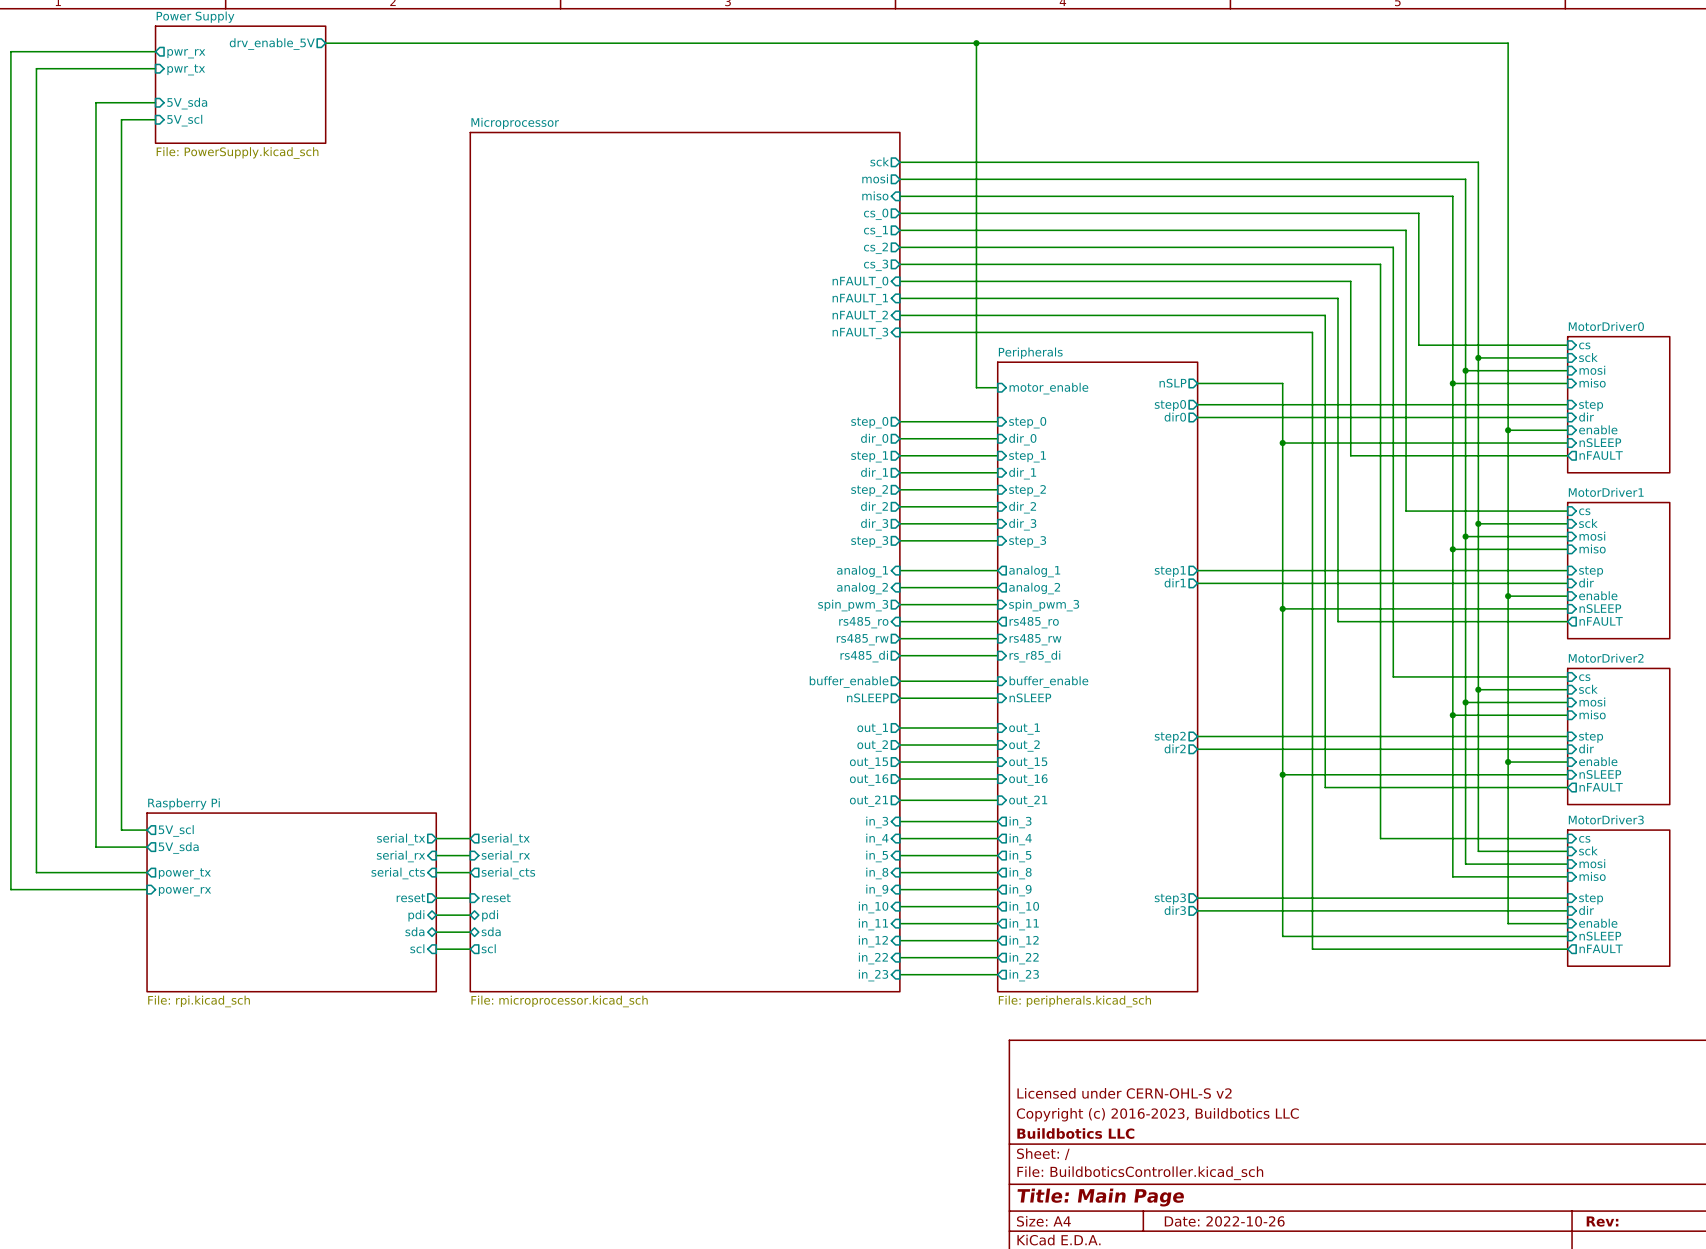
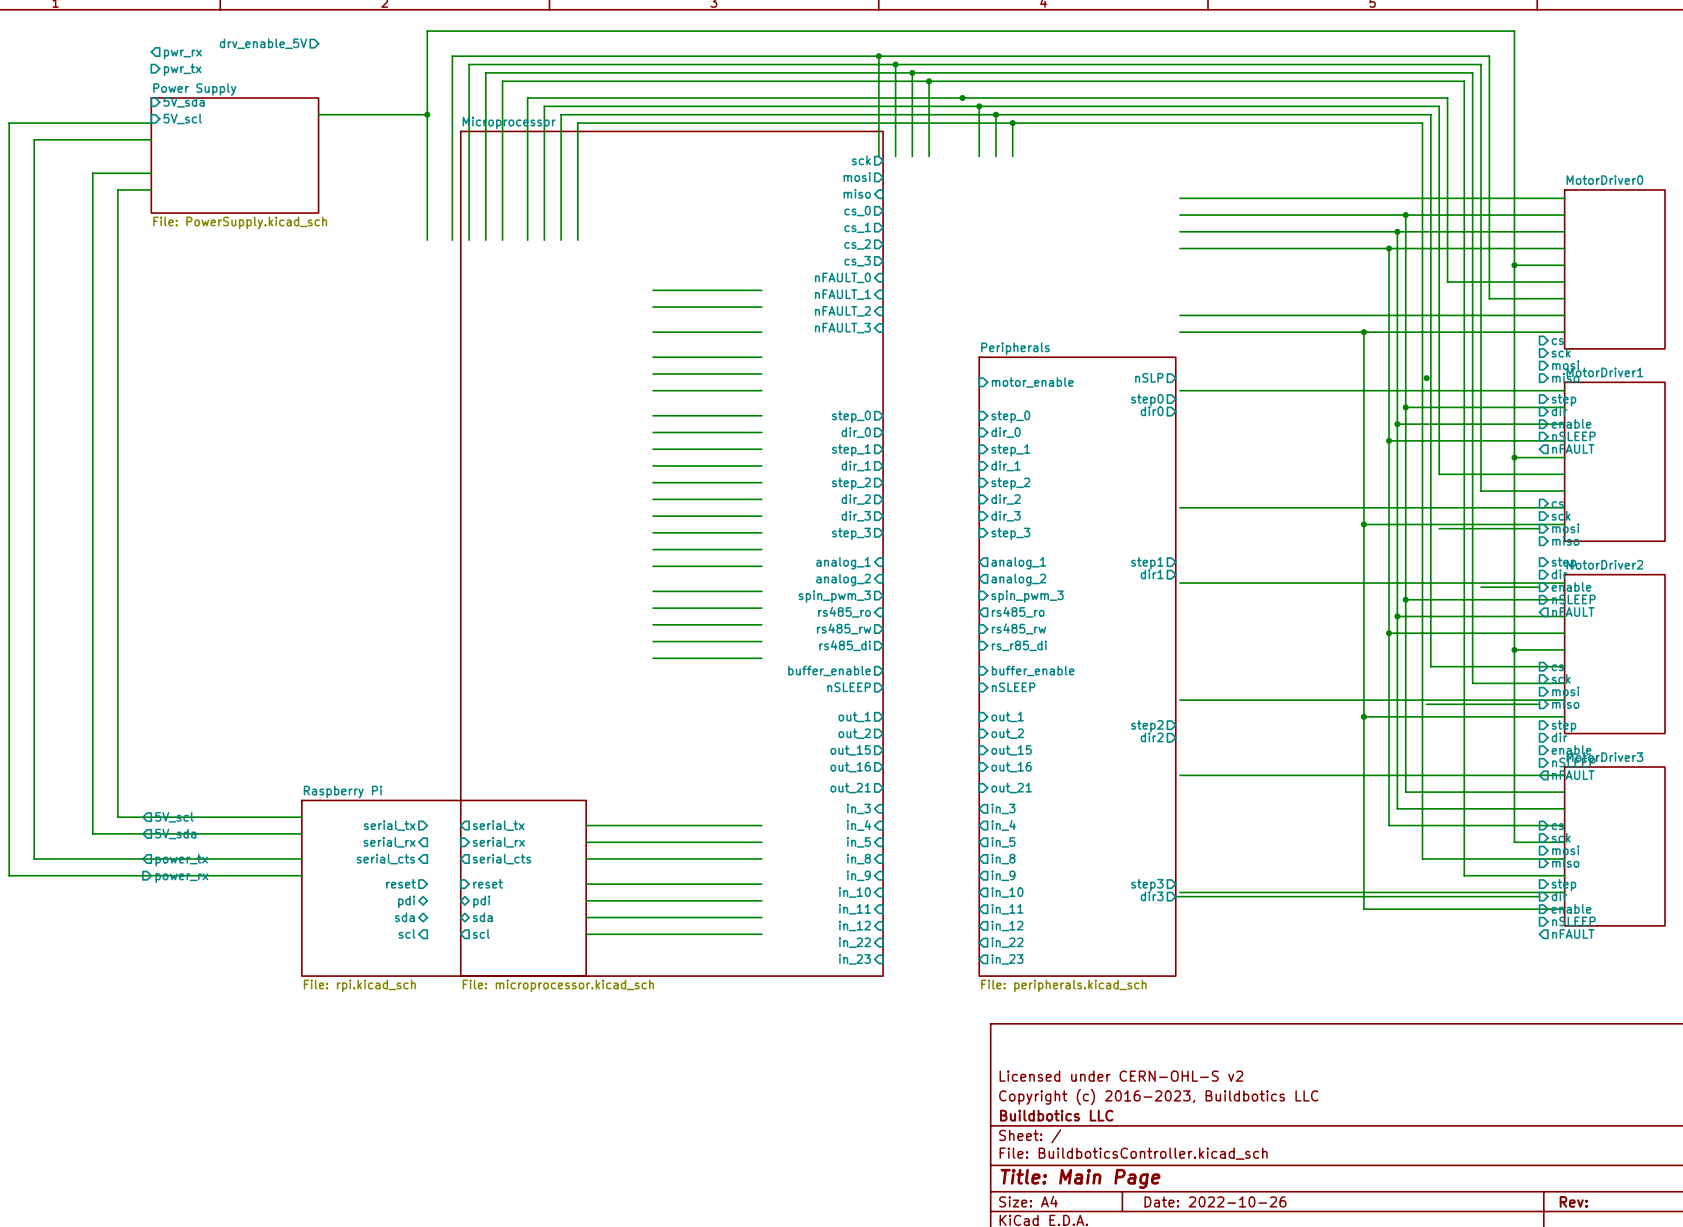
wire: (325, 43) (1508, 43) (1508, 64) -> (469, 240) (469, 64) (1481, 64)
wire: (976, 43) (976, 387) (997, 387) -> none
junction: (976, 43) -> none
wire: (155, 51) (10, 51) (10, 124) -> (151, 123) (9, 123)
wire: none -> (878, 56) (878, 156)
junction: none -> (878, 56)
wire: none -> (895, 64) (895, 156)
junction: none -> (895, 64)
wire: (155, 68) (36, 68) (36, 141) -> (151, 139) (34, 139)
wire: none -> (912, 72) (912, 156)
junction: none -> (912, 72)
wire: none -> (929, 81) (929, 156)
junction: none -> (929, 81)
sheet Power Supply position: (240, 84) -> (234, 155)
junction: none -> (962, 97)
wire: (155, 102) (95, 102) (95, 175) -> (151, 173) (92, 173)
wire: none -> (979, 106) (979, 156)
junction: none -> (979, 106)
wire: none -> (318, 114) (427, 114)
junction: none -> (427, 114)
wire: none -> (995, 114) (995, 156)
junction: none -> (995, 114)
wire: (155, 119) (121, 119) (121, 192) -> (151, 189) (117, 189)
wire: none -> (1012, 123) (1012, 156)
junction: none -> (1012, 123)
wire: (899, 162) (1478, 162) (1478, 851) (1567, 851) -> none
wire: (899, 179) (1465, 179) -> (544, 240) (544, 106) (1439, 106) (1439, 177)
wire: (899, 196) (1452, 196) (1452, 876) (1567, 876) -> none
wire: none -> (1179, 198) (1564, 198)
wire: (899, 213) (1418, 213) (1418, 345) (1567, 345) -> none
wire: none -> (1179, 215) (1564, 215)
wire: none -> (1405, 215) (1405, 792) (1564, 792)
junction: none -> (1405, 215)
wire: (899, 230) (1406, 230) (1406, 511) (1567, 511) -> none
wire: none -> (1179, 231) (1564, 231)
wire: none -> (1397, 231) (1397, 808) (1564, 808)
junction: none -> (1397, 231)
wire: none -> (427, 240) (427, 31) (1514, 31) (1514, 842) (1564, 842)
wire: none -> (452, 240) (452, 56) (1489, 56) (1489, 298) (1564, 298)
wire: none -> (485, 240) (485, 72) (1472, 72) (1472, 683) (1564, 683)
wire: none -> (502, 240) (502, 81) (1464, 81) (1464, 875) (1564, 875)
wire: none -> (527, 240) (527, 97) (1447, 97) (1447, 281) (1564, 281)
wire: none -> (577, 240) (577, 123) (1422, 123) (1422, 859) (1564, 859)
wire: (899, 247) (1393, 247) (1393, 676) (1457, 676) -> (561, 240) (561, 114) (1430, 114) (1430, 666)
wire: none -> (1179, 248) (1564, 248)
junction: none -> (1389, 248)
wire: (899, 264) (1380, 264) (1380, 838) (1414, 838) -> (1389, 248) (1389, 825)
wire: none -> (1514, 265) (1564, 265)
junction: none -> (1514, 265)
wire: (899, 281) (1350, 281) (1350, 455) (1567, 455) -> none
wire: none -> (653, 290) (761, 290)
wire: (899, 298) (1337, 298) (1337, 621) (1567, 621) -> none
wire: none -> (653, 307) (761, 307)
wire: (899, 315) (1325, 315) (1325, 787) -> (1179, 775) (1301, 775)
wire: none -> (1179, 315) (1564, 315)
wire: (899, 332) (1312, 332) (1312, 949) (1567, 949) -> none
wire: none -> (653, 332) (761, 332)
wire: none -> (1179, 332) (1564, 332)
junction: none -> (1363, 332)
sheet MotorDriver0 shape: [1567, 336, 1671, 474] -> [1564, 189, 1666, 350]
wire: (1478, 357) (1567, 357) -> none
junction: (1478, 357) -> none
wire: none -> (653, 357) (761, 357)
wire: (1465, 370) (1567, 370) -> none
junction: (1465, 370) -> none
wire: none -> (653, 373) (761, 373)
wire: (1197, 383) (1282, 383) (1282, 936) (1567, 936) -> none
wire: (1452, 383) (1567, 383) -> none
wire: none -> (653, 390) (761, 390)
wire: none -> (1179, 390) (1564, 390)
wire: (1197, 404) (1567, 404) -> none
wire: none -> (1405, 407) (1564, 407)
junction: none -> (1405, 407)
wire: (1197, 417) (1567, 417) -> none
wire: none -> (653, 415) (761, 415)
wire: (899, 421) (997, 421) -> none
wire: none -> (1397, 424) (1481, 424)
junction: none -> (1397, 424)
junction: (1508, 430) -> none
wire: none -> (1539, 424) (1564, 424)
wire: none -> (653, 432) (761, 432)
wire: (899, 438) (997, 438) -> none
wire: (1282, 443) (1567, 443) -> none
junction: (1282, 443) -> none
wire: none -> (1389, 440) (1564, 440)
junction: none -> (1389, 440)
wire: none -> (653, 449) (761, 449)
wire: (899, 455) (997, 455) -> none
wire: none -> (1514, 457) (1564, 457)
junction: none -> (1514, 457)
wire: none -> (653, 465) (761, 465)
wire: (899, 472) (997, 472) -> none
wire: (1465, 481) (1465, 864) (1567, 864) -> (1439, 474) (1564, 474)
wire: none -> (653, 482) (761, 482)
wire: (899, 489) (997, 489) -> none
wire: (1508, 498) (1508, 923) -> (1363, 332) (1363, 909) (1481, 909)
wire: none -> (1481, 491) (1564, 491)
sheet MotorDriver1 shape: [1567, 502, 1671, 640] -> [1564, 381, 1666, 542]
wire: none -> (653, 499) (761, 499)
wire: (899, 506) (997, 506) -> none
wire: none -> (1179, 507) (1564, 507)
wire: none -> (653, 516) (761, 516)
wire: (899, 523) (997, 523) -> none
wire: (1478, 523) (1567, 523) -> none
junction: (1478, 523) -> none
wire: none -> (1363, 524) (1564, 524)
junction: none -> (1363, 524)
junction: (1465, 536) -> none
wire: none -> (653, 532) (761, 532)
wire: (899, 540) (997, 540) -> none
wire: (1452, 549) (1567, 549) -> none
junction: (1452, 549) -> none
wire: none -> (653, 549) (761, 549)
wire: (899, 570) (997, 570) -> none
wire: (1197, 570) (1567, 570) -> none
wire: none -> (653, 566) (761, 566)
wire: (1197, 583) (1567, 583) -> none
wire: (899, 587) (997, 587) -> none
wire: none -> (1179, 583) (1564, 583)
junction: (1508, 596) -> none
wire: none -> (653, 591) (761, 591)
wire: (899, 604) (997, 604) -> none
wire: (1282, 608) (1431, 608) -> none
junction: (1282, 608) -> none
junction: none -> (1405, 599)
wire: none -> (1539, 599) (1564, 599)
wire: none -> (653, 608) (761, 608)
wire: (899, 621) (997, 621) -> none
wire: none -> (1397, 616) (1564, 616)
junction: none -> (1397, 616)
wire: none -> (653, 624) (761, 624)
wire: (899, 638) (997, 638) -> none
wire: none -> (1389, 633) (1564, 633)
junction: none -> (1389, 633)
wire: none -> (653, 641) (761, 641)
wire: (899, 655) (997, 655) -> none
wire: none -> (1514, 649) (1564, 649)
junction: none -> (1514, 649)
sheet MotorDriver2 shape: [1567, 667, 1671, 806] -> [1564, 574, 1666, 735]
wire: none -> (653, 658) (761, 658)
wire: none -> (1539, 666) (1564, 666)
wire: (899, 681) (997, 681) -> none
wire: (1478, 689) (1567, 689) -> none
junction: (1478, 689) -> none
wire: (899, 698) (997, 698) -> none
wire: (1465, 702) (1567, 702) -> none
junction: (1465, 702) -> none
wire: none -> (1179, 700) (1564, 700)
junction: (1452, 715) -> none
wire: (899, 727) (997, 727) -> none
wire: none -> (1363, 716) (1564, 716)
junction: none -> (1363, 716)
wire: (1197, 736) (1567, 736) -> none
wire: (899, 745) (997, 745) -> none
wire: (1197, 749) (1567, 749) -> none
wire: (899, 762) (997, 762) -> none
wire: (1508, 762) (1567, 762) -> none
junction: (1508, 762) -> none
wire: (1282, 774) (1567, 774) -> none
junction: (1282, 774) -> none
wire: (899, 779) (997, 779) -> none
wire: none -> (1539, 775) (1564, 775)
wire: (899, 800) (997, 800) -> none
wire: (899, 821) (997, 821) -> none
sheet MotorDriver3 shape: [1567, 829, 1671, 967] -> [1564, 766, 1666, 927]
wire: none -> (142, 817) (301, 817)
wire: (436, 838) (470, 838) -> none
wire: none -> (586, 825) (761, 825)
wire: (899, 838) (997, 838) -> none
wire: none -> (1539, 825) (1564, 825)
wire: none -> (142, 833) (301, 833)
wire: (436, 855) (470, 855) -> none
wire: none -> (586, 842) (761, 842)
wire: (899, 855) (997, 855) -> none
wire: none -> (142, 859) (301, 859)
wire: (436, 872) (470, 872) -> none
wire: none -> (586, 859) (761, 859)
wire: (899, 872) (997, 872) -> none
wire: none -> (142, 875) (301, 875)
wire: (899, 889) (997, 889) -> none
wire: (436, 898) (470, 898) -> none
wire: none -> (586, 884) (761, 884)
wire: (1197, 898) (1567, 898) -> none
sheet Raspberry Pi position: (291, 902) -> (444, 888)
wire: (899, 906) (997, 906) -> none
wire: none -> (1179, 892) (1564, 892)
wire: (436, 915) (470, 915) -> none
wire: none -> (586, 900) (761, 900)
wire: (899, 923) (997, 923) -> none
wire: none -> (1539, 909) (1564, 909)
wire: (436, 932) (470, 932) -> none
wire: none -> (586, 917) (761, 917)
wire: (899, 940) (997, 940) -> none
wire: (436, 949) (470, 949) -> none
wire: none -> (586, 934) (761, 934)
wire: (899, 957) (997, 957) -> none
wire: (899, 974) (997, 974) -> none

